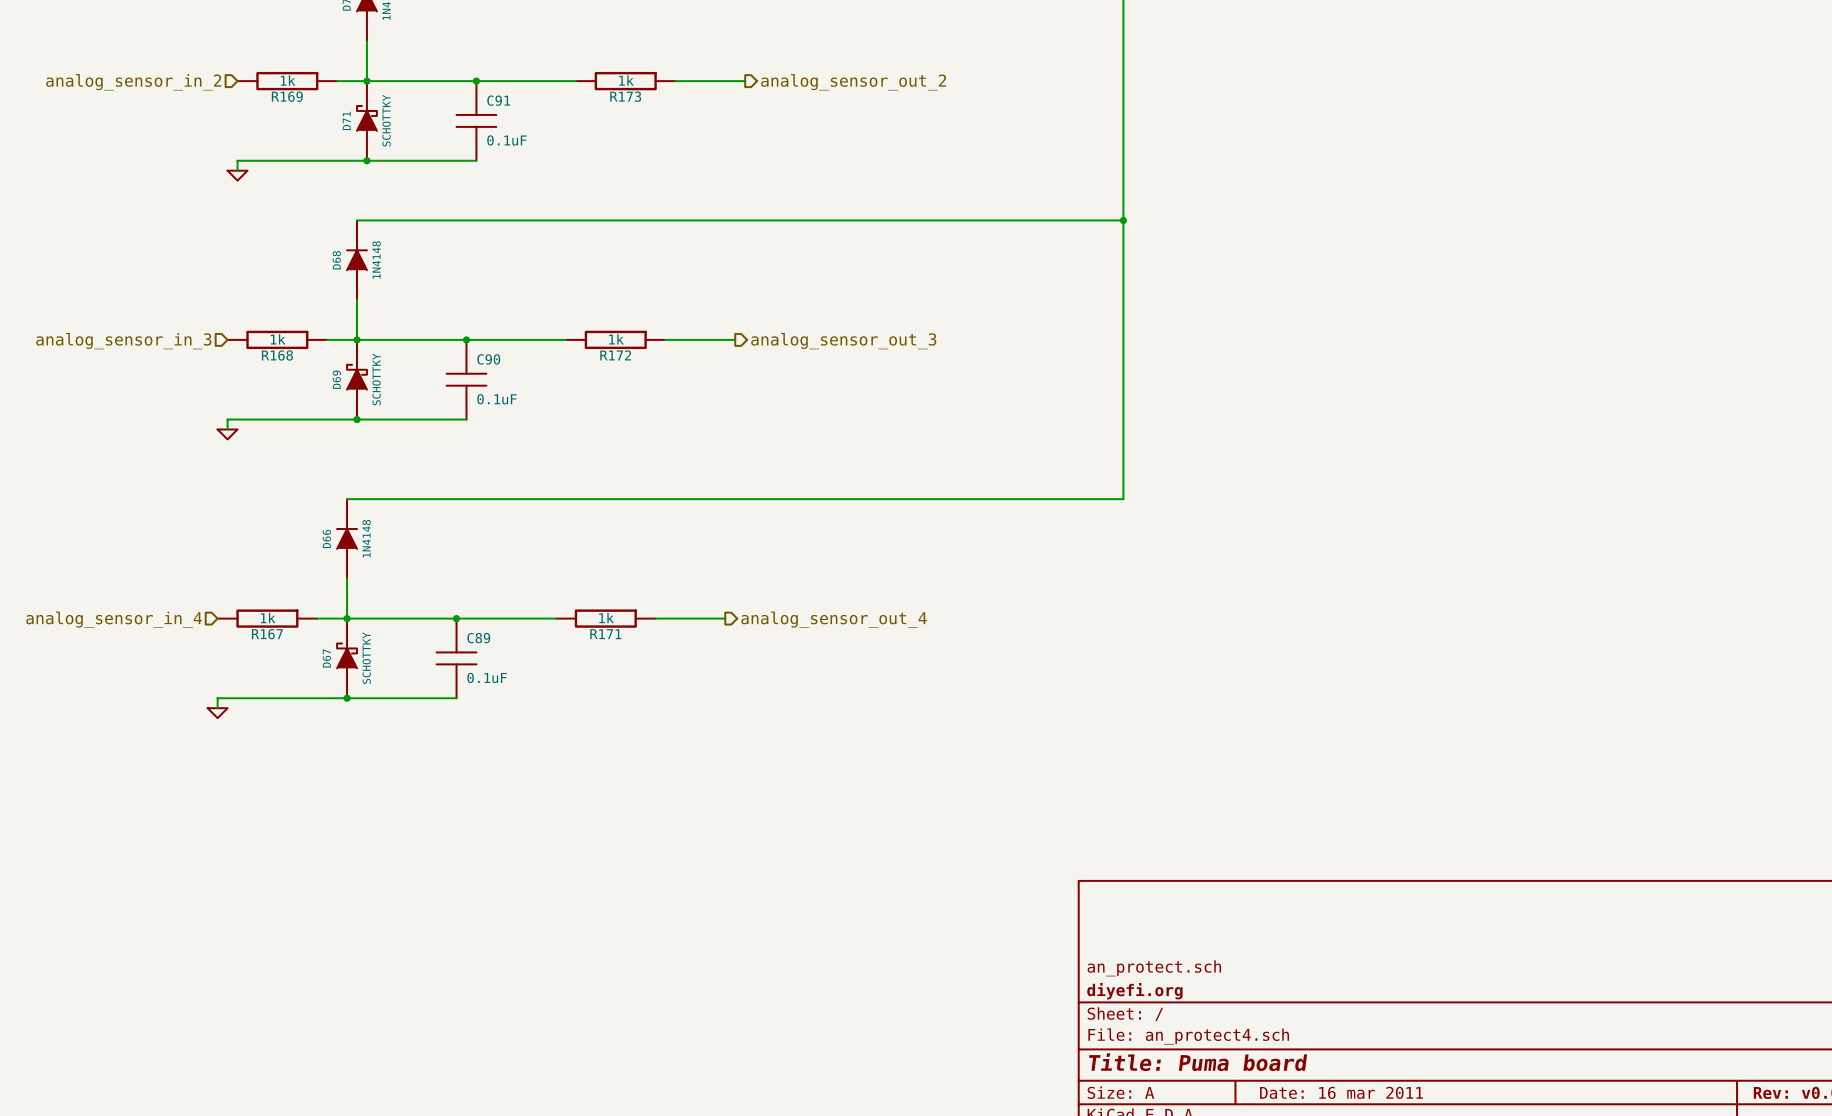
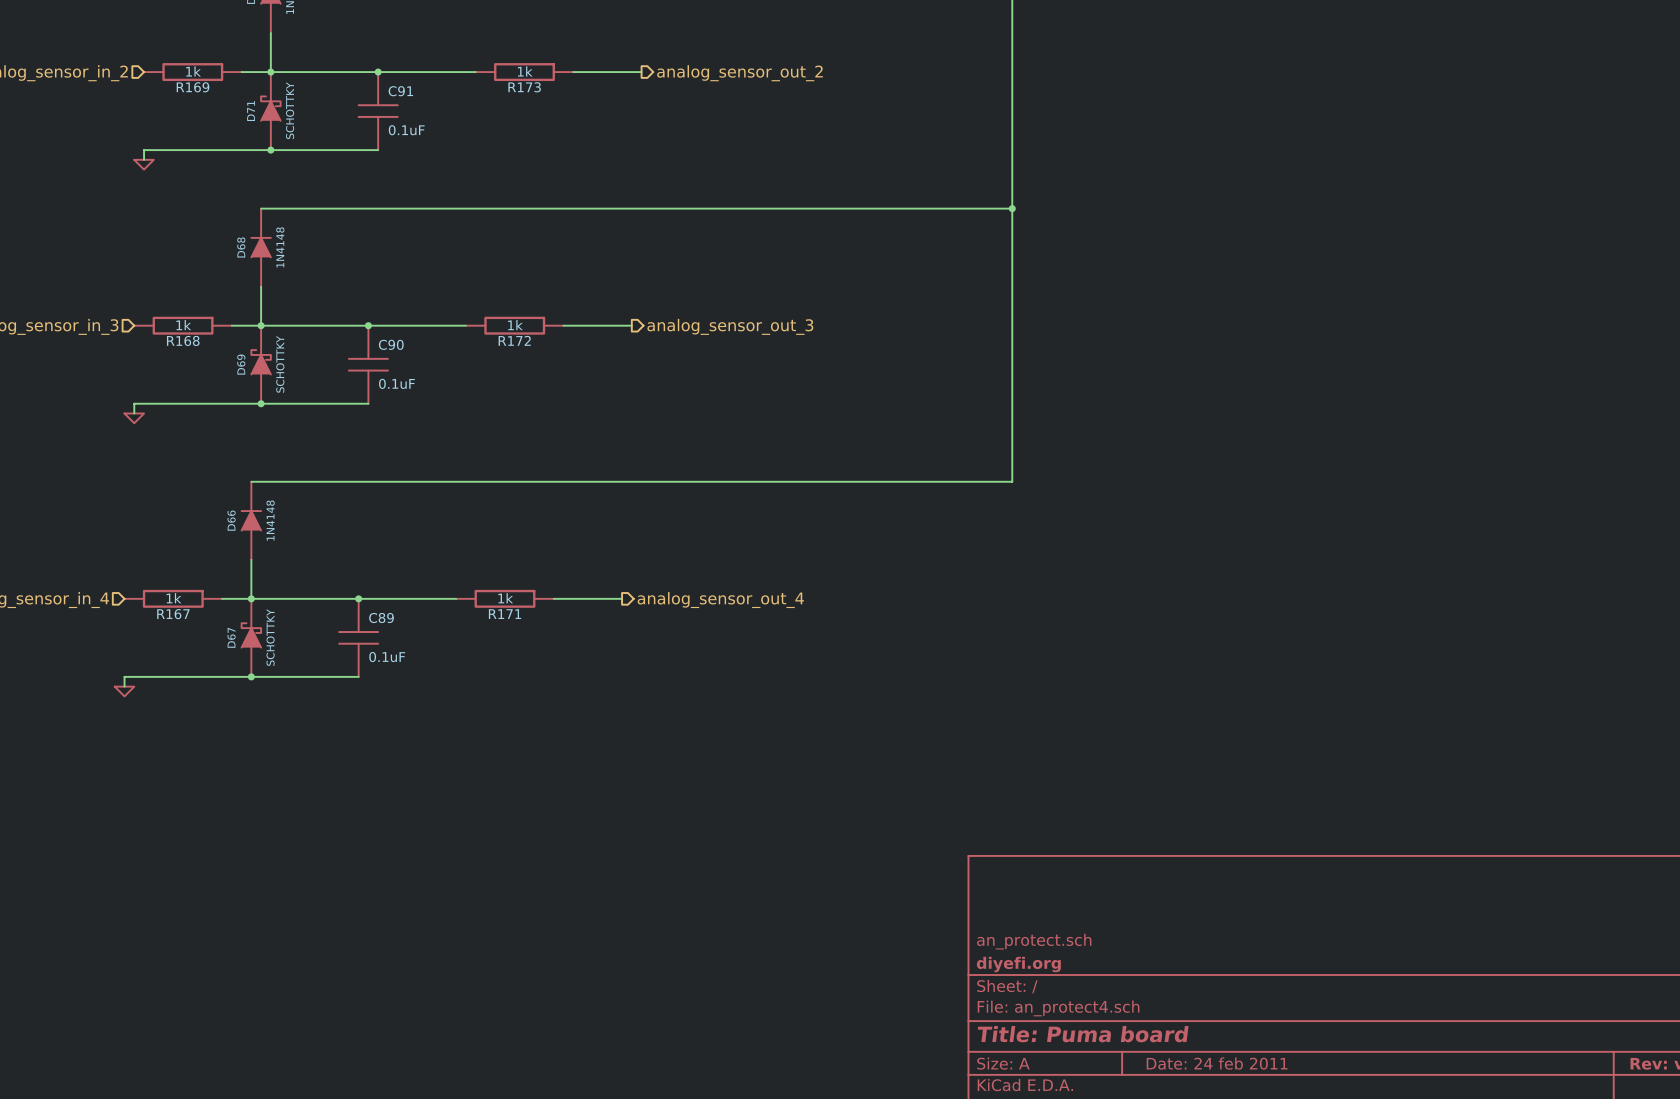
title block: Date: 16 mar 2011 (1341, 1092) -> Date: 24 feb 2011 (1217, 1063)

